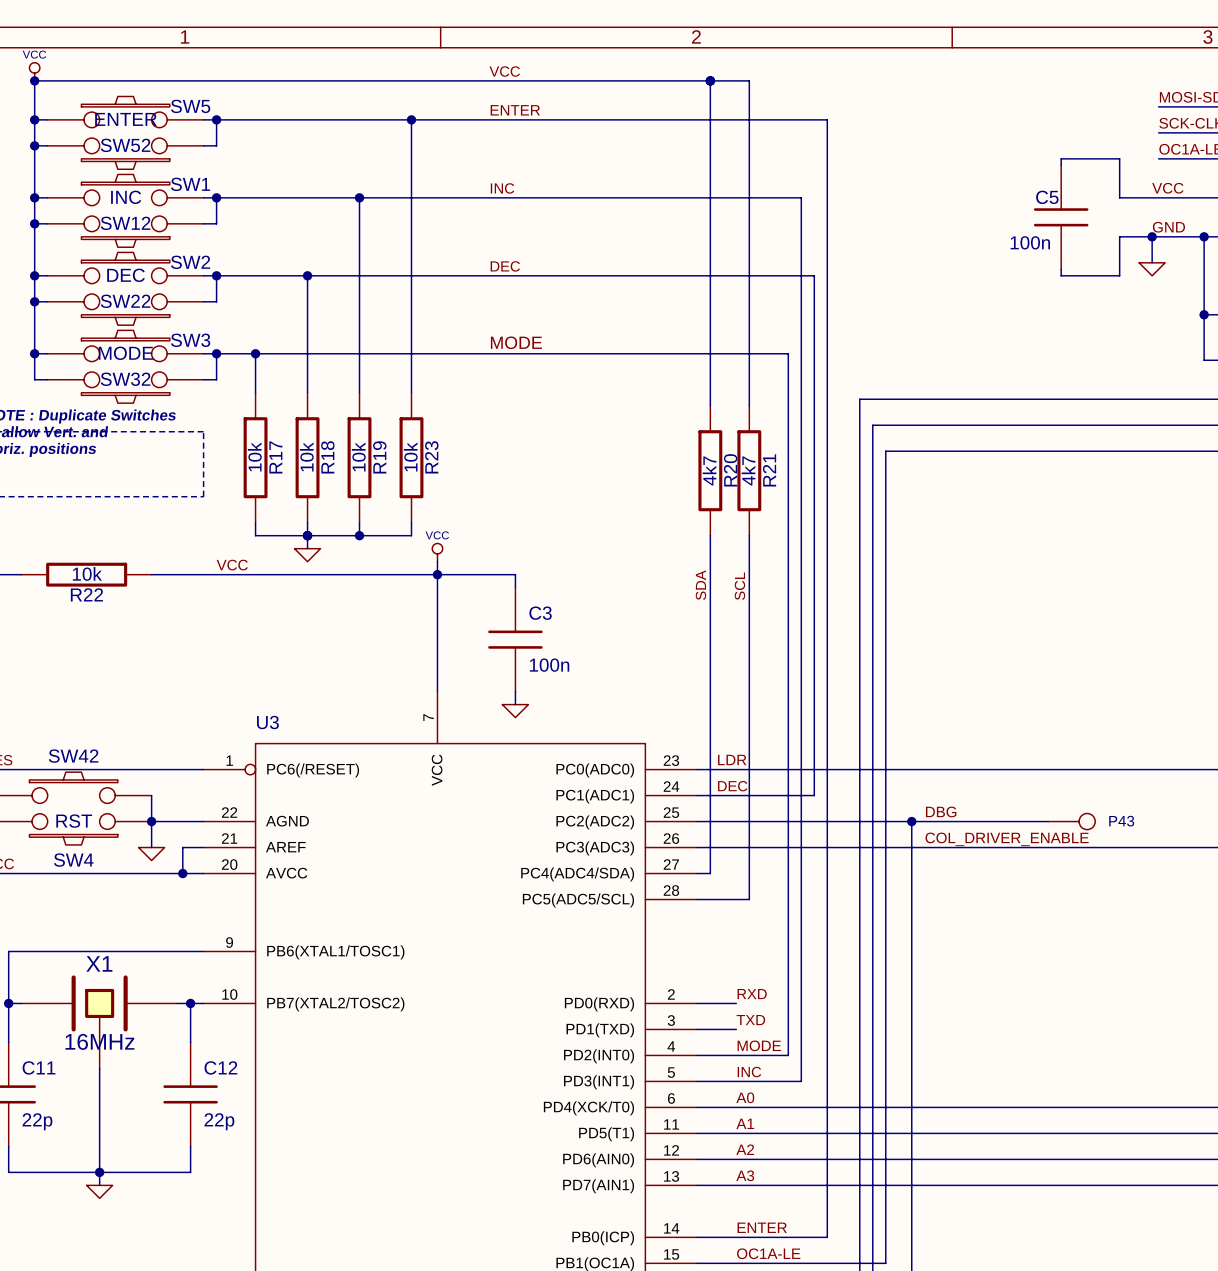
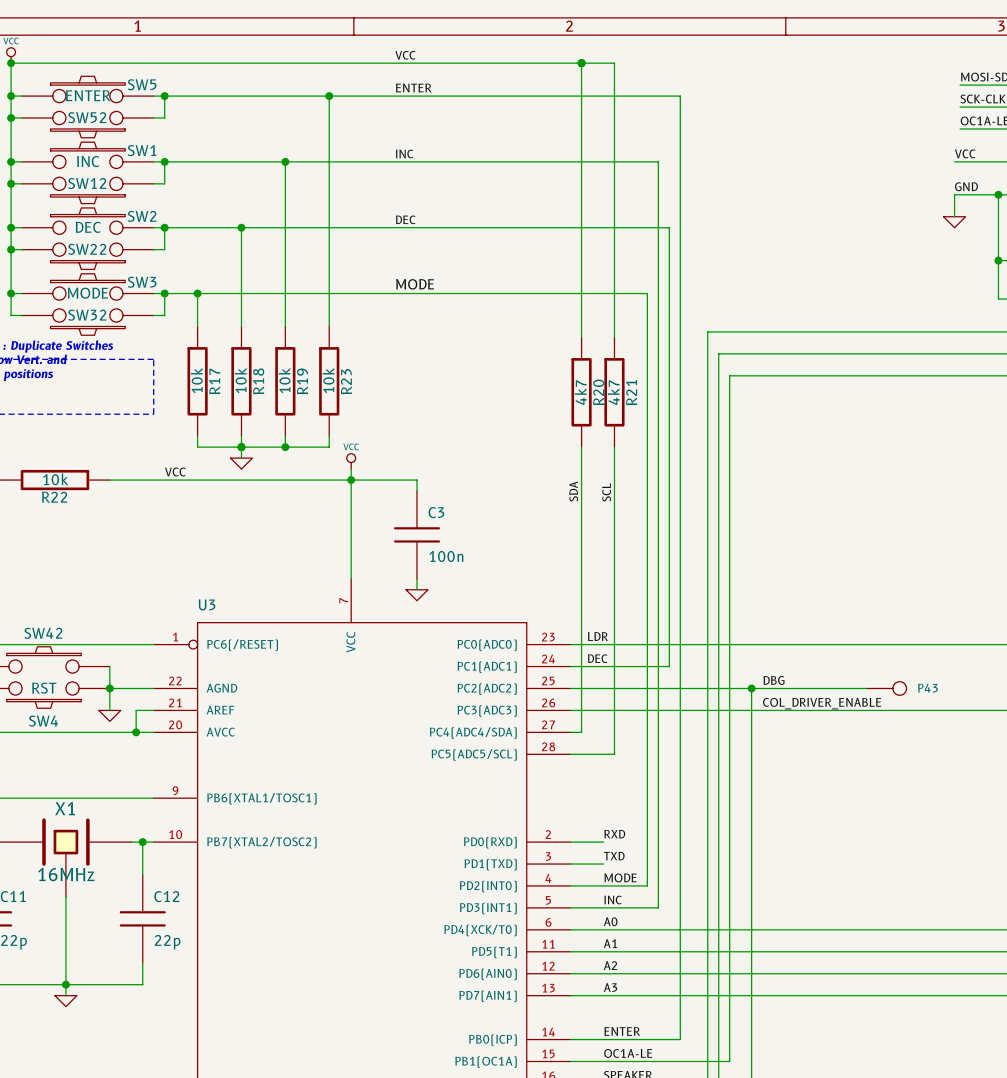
wire: (1061, 165) (1061, 158) (1119, 158) (1119, 197) (1152, 197) -> none
C5: 100n (1061, 217) -> none
wire: (1152, 236) (1119, 236) (1119, 275) (1061, 275) (1061, 269) -> none
junction: (1152, 236) -> none

